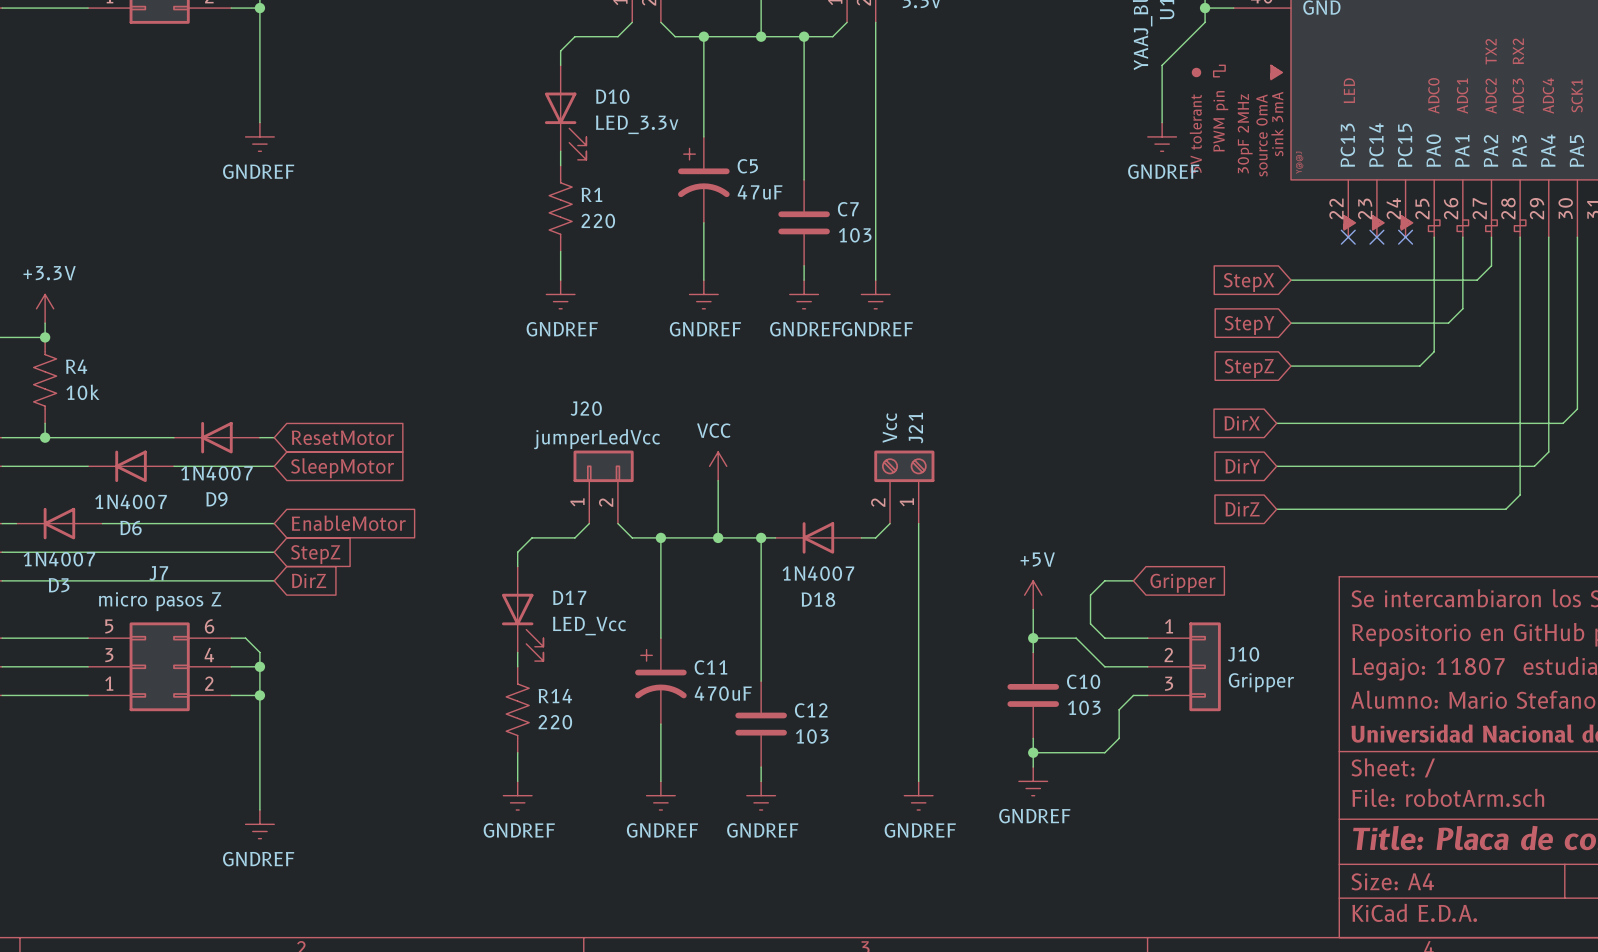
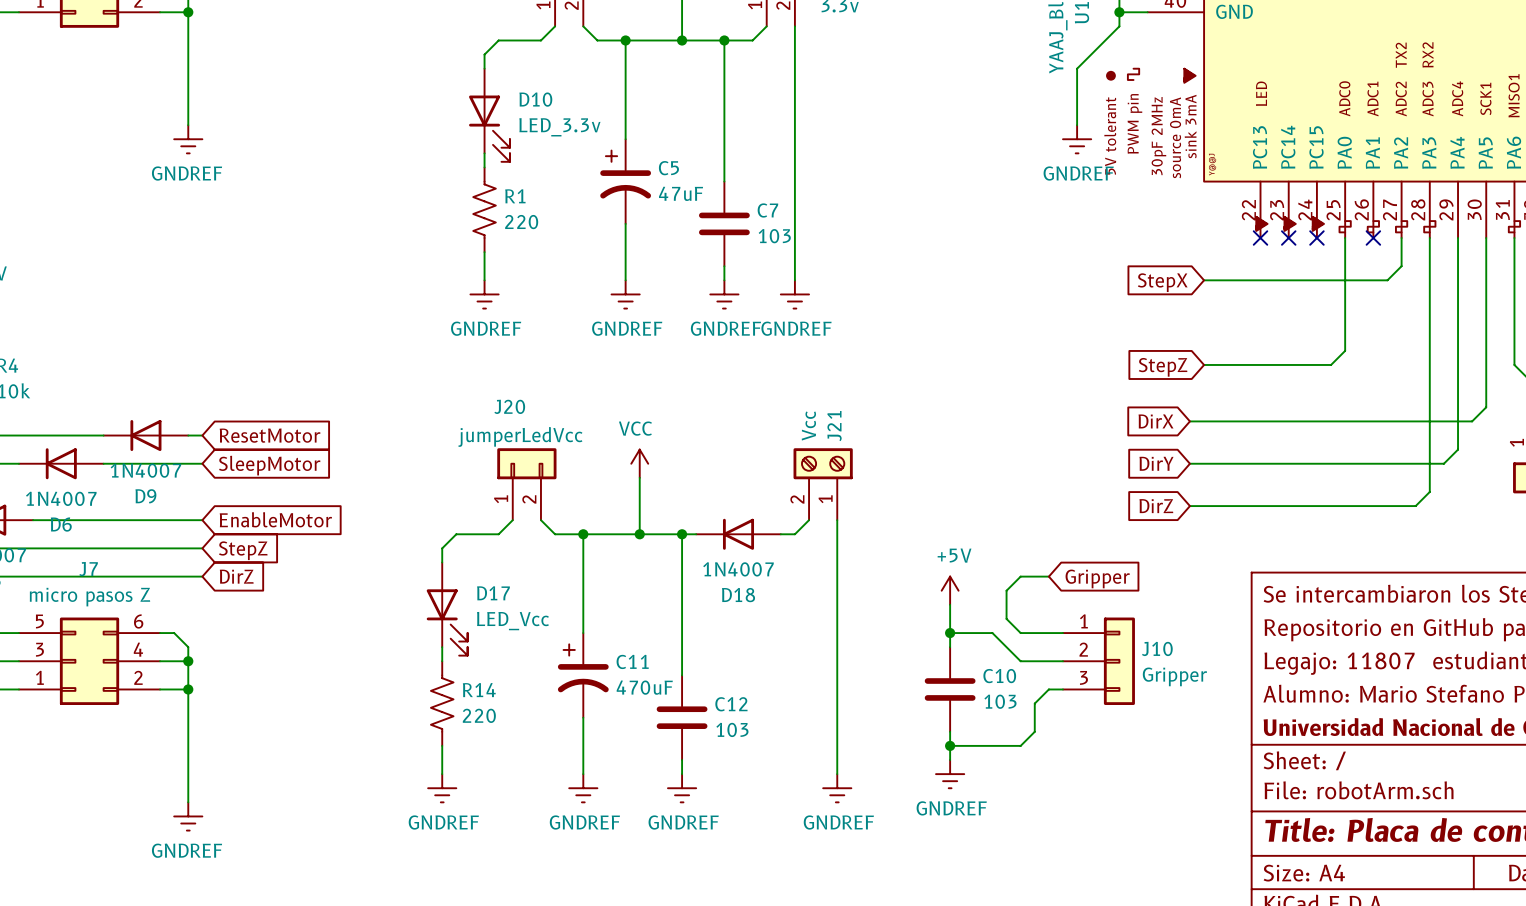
wire: (1462, 237) (1462, 308) (1448, 323) (1291, 323) -> none
no-connect mark: none -> (1373, 238)
global label: StepY (1249, 325) -> none

